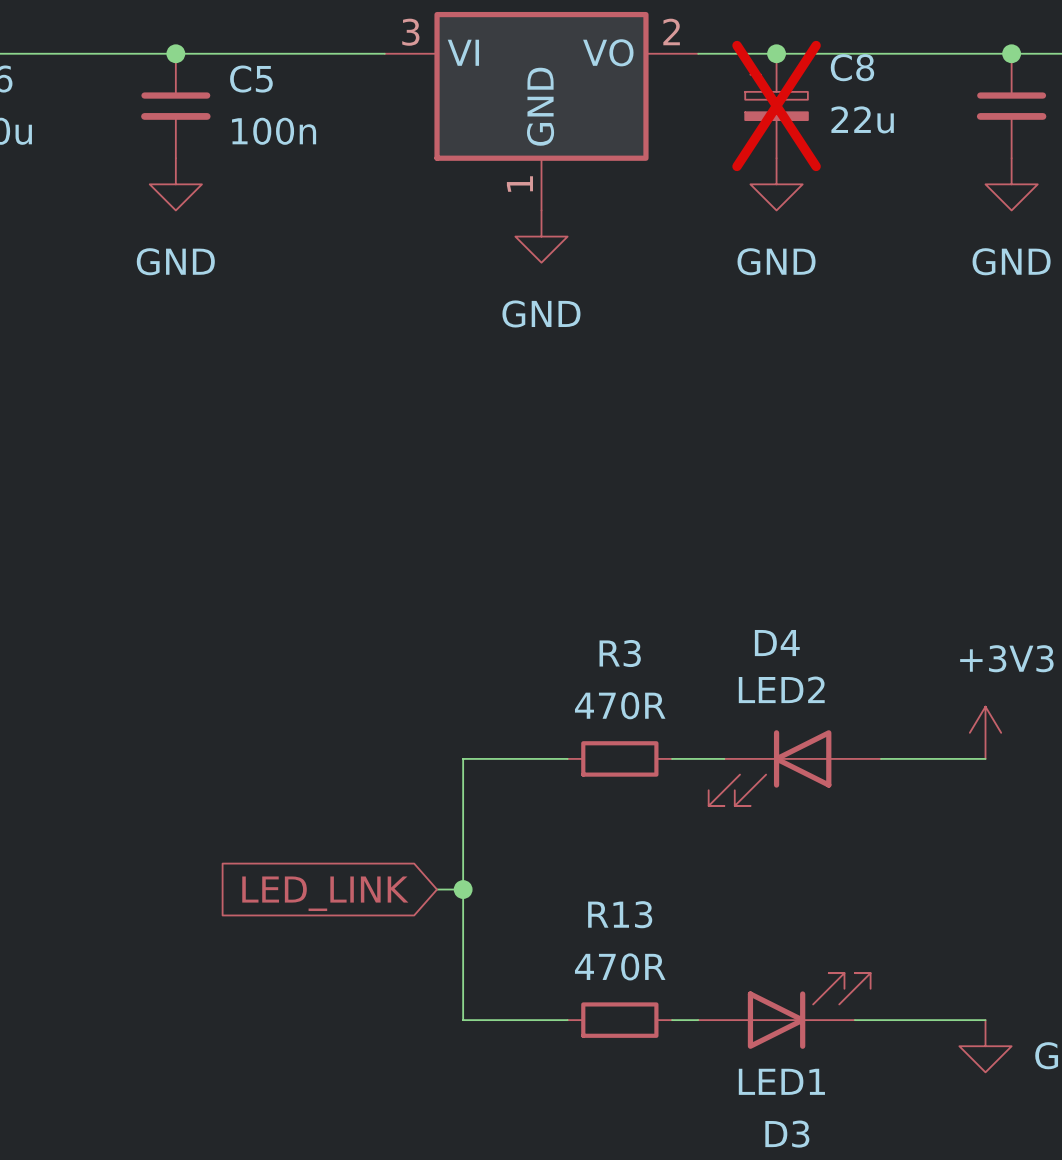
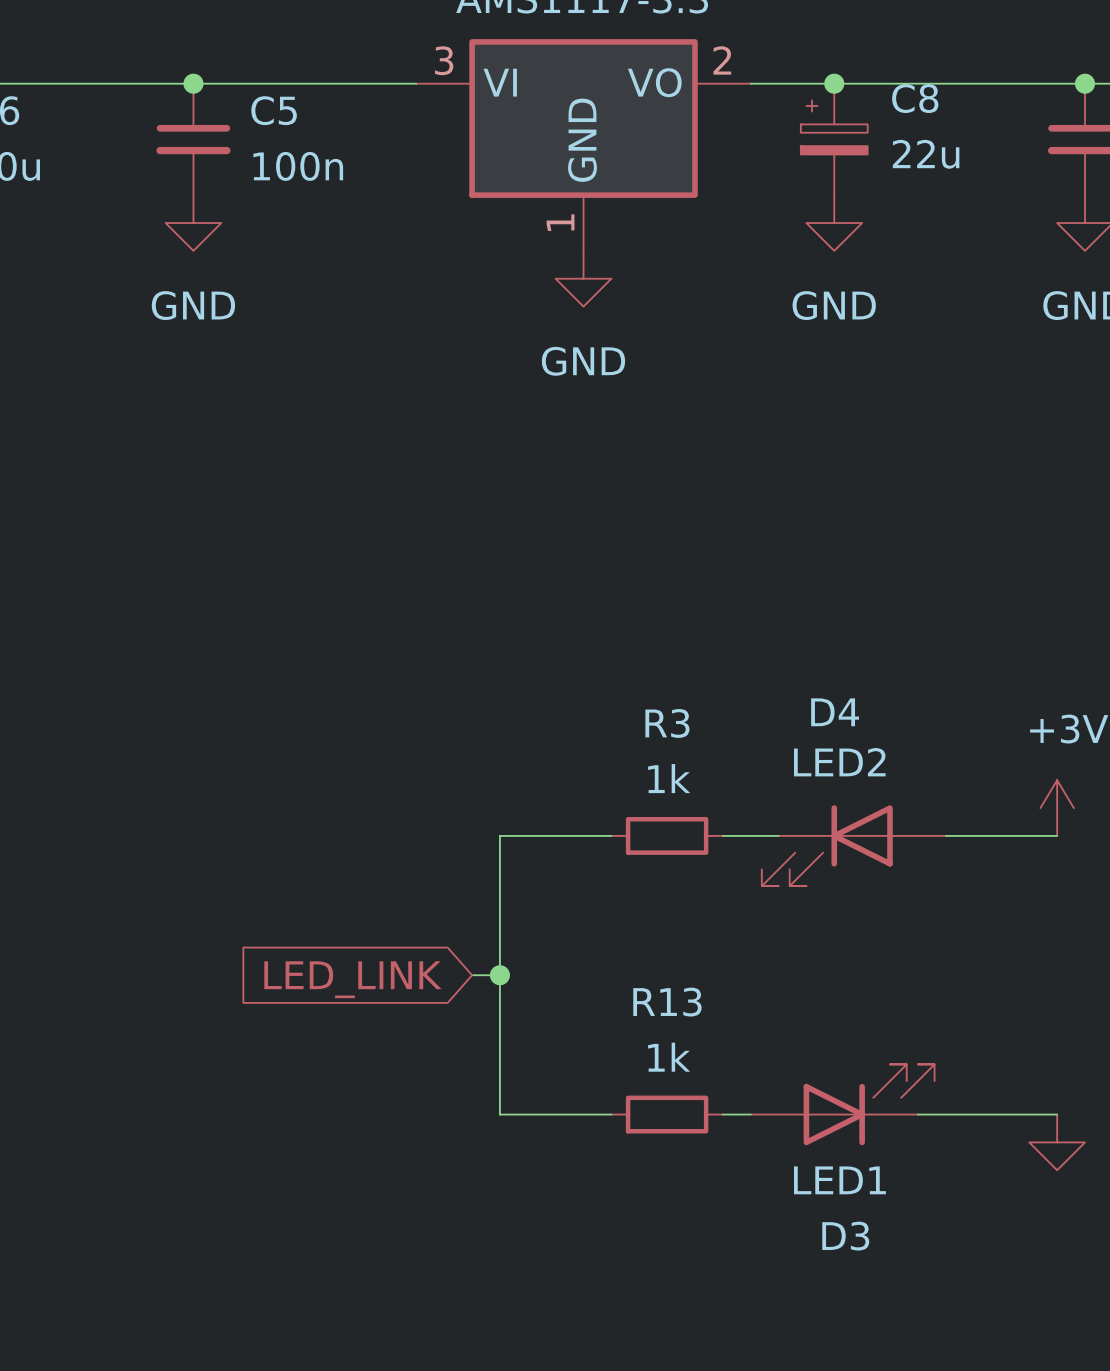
C8 do-not-place cross: (776, 105) -> none
R3 value: 470R (620, 705) -> 1k (669, 778)
R13 value: 470R (620, 966) -> 1k (669, 1057)

